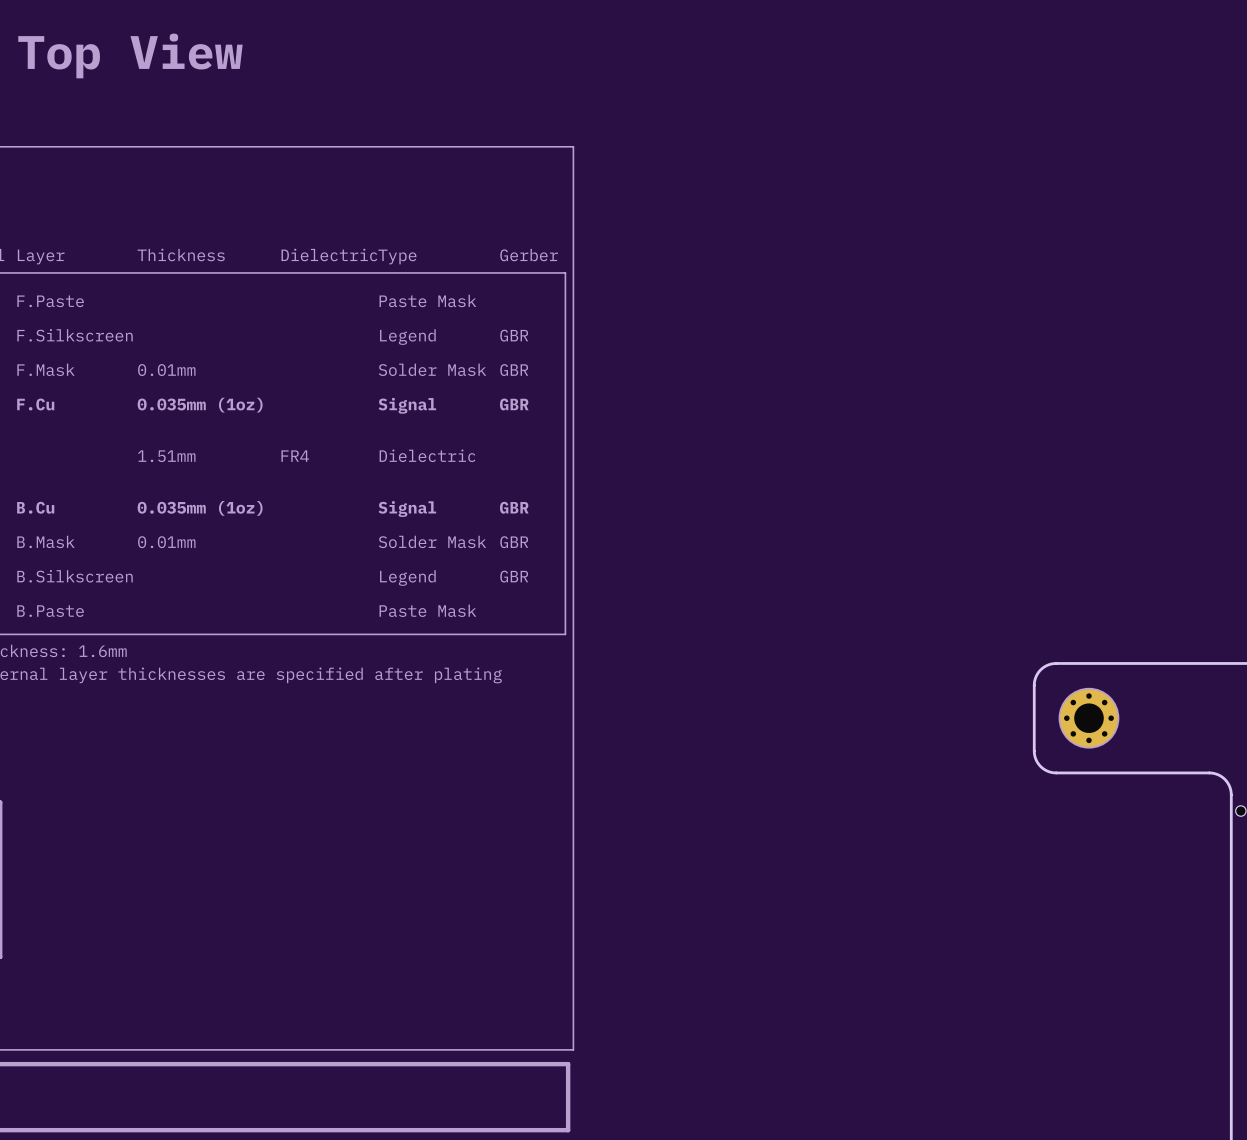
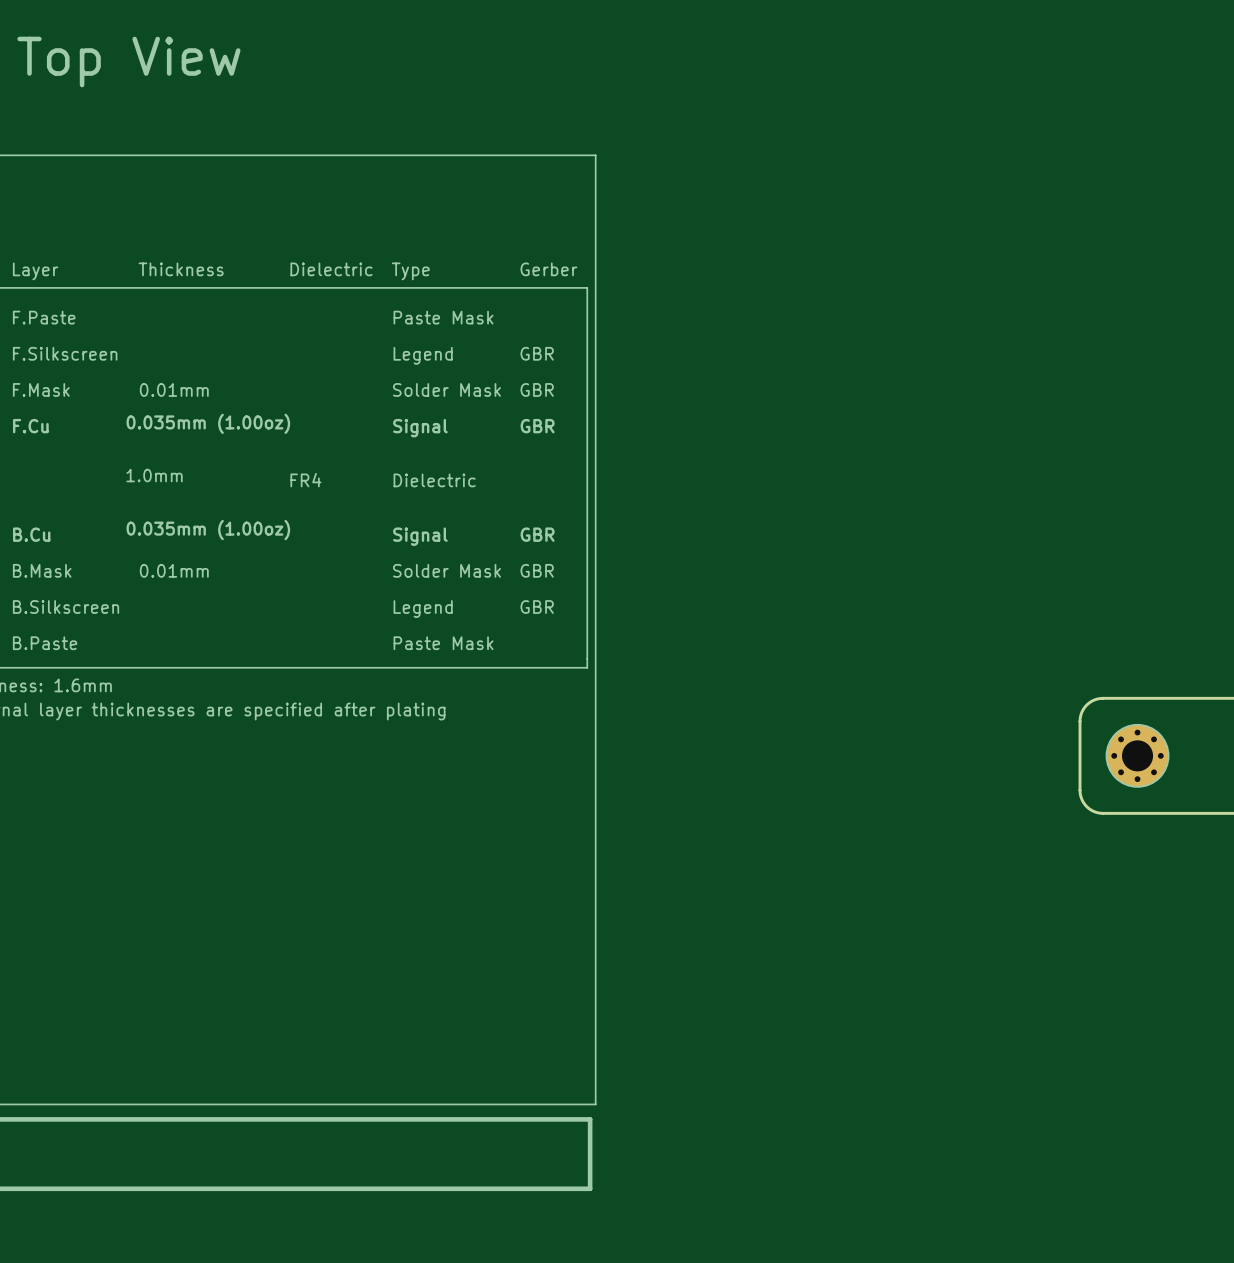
text: 0.035mm (1oz) (200, 405) -> 0.035mm (1.00oz) (208, 423)
text: 1.51mm (166, 456) -> 1.0mm (154, 475)
text: 0.035mm (1oz) (200, 508) -> 0.035mm (1.00oz) (208, 530)

